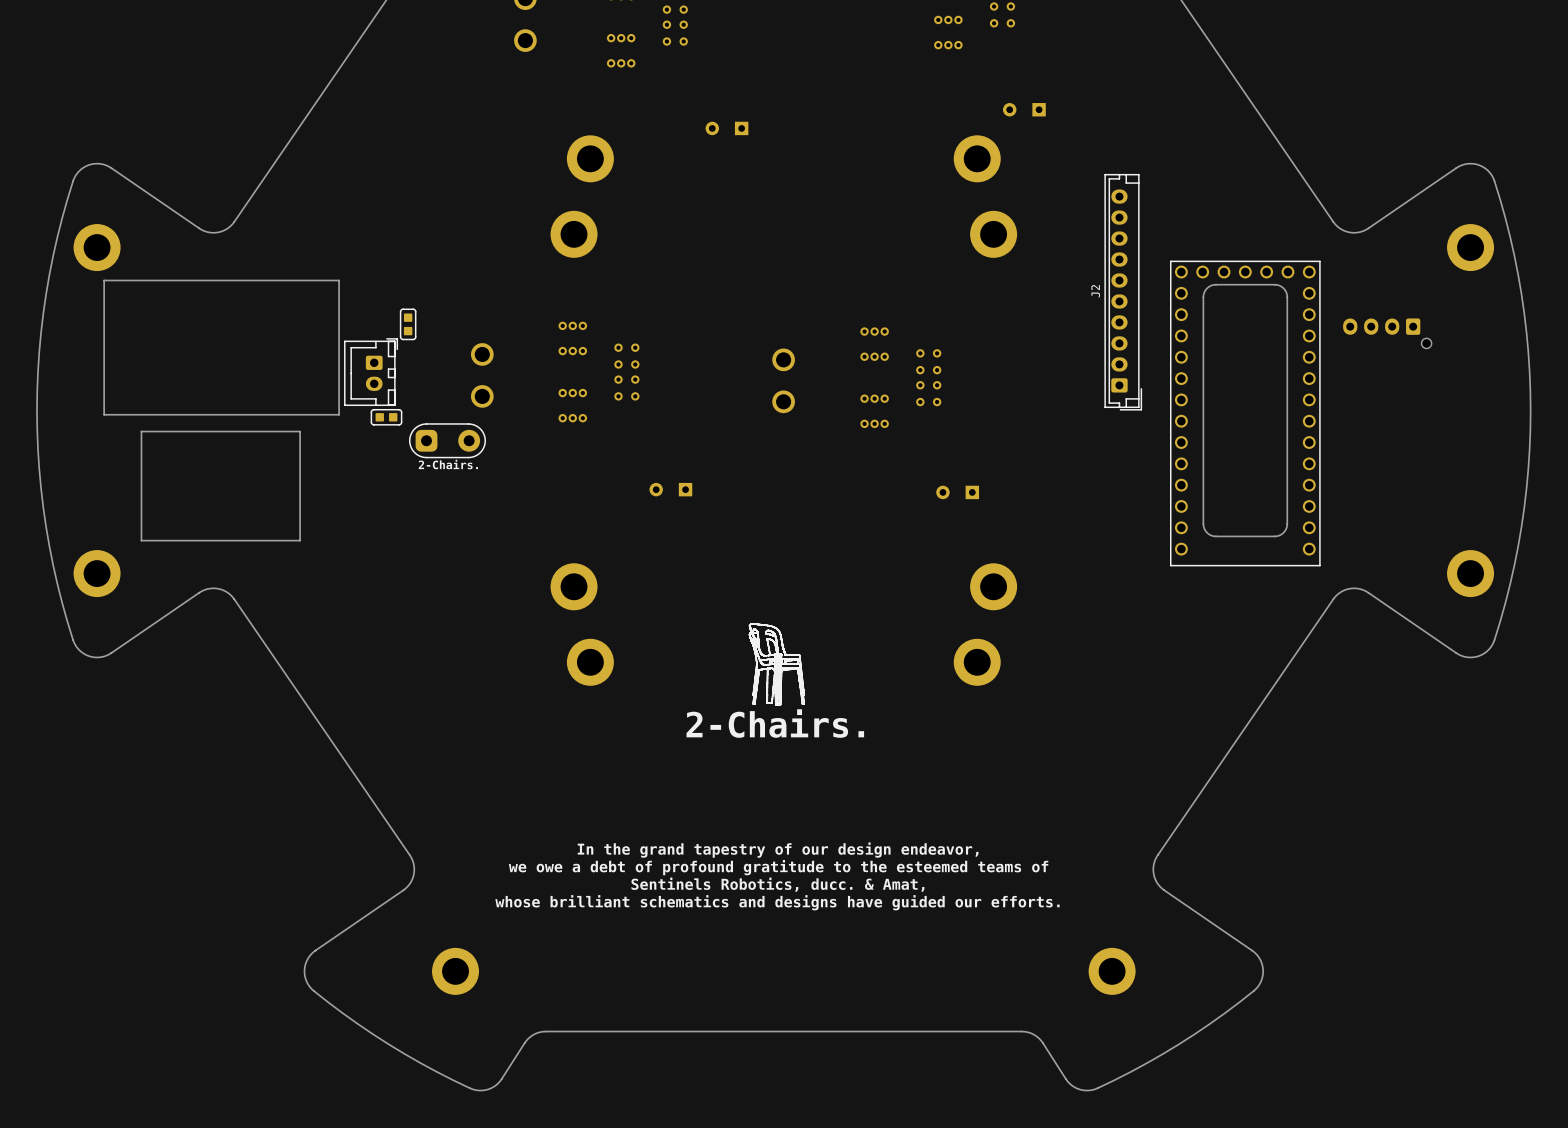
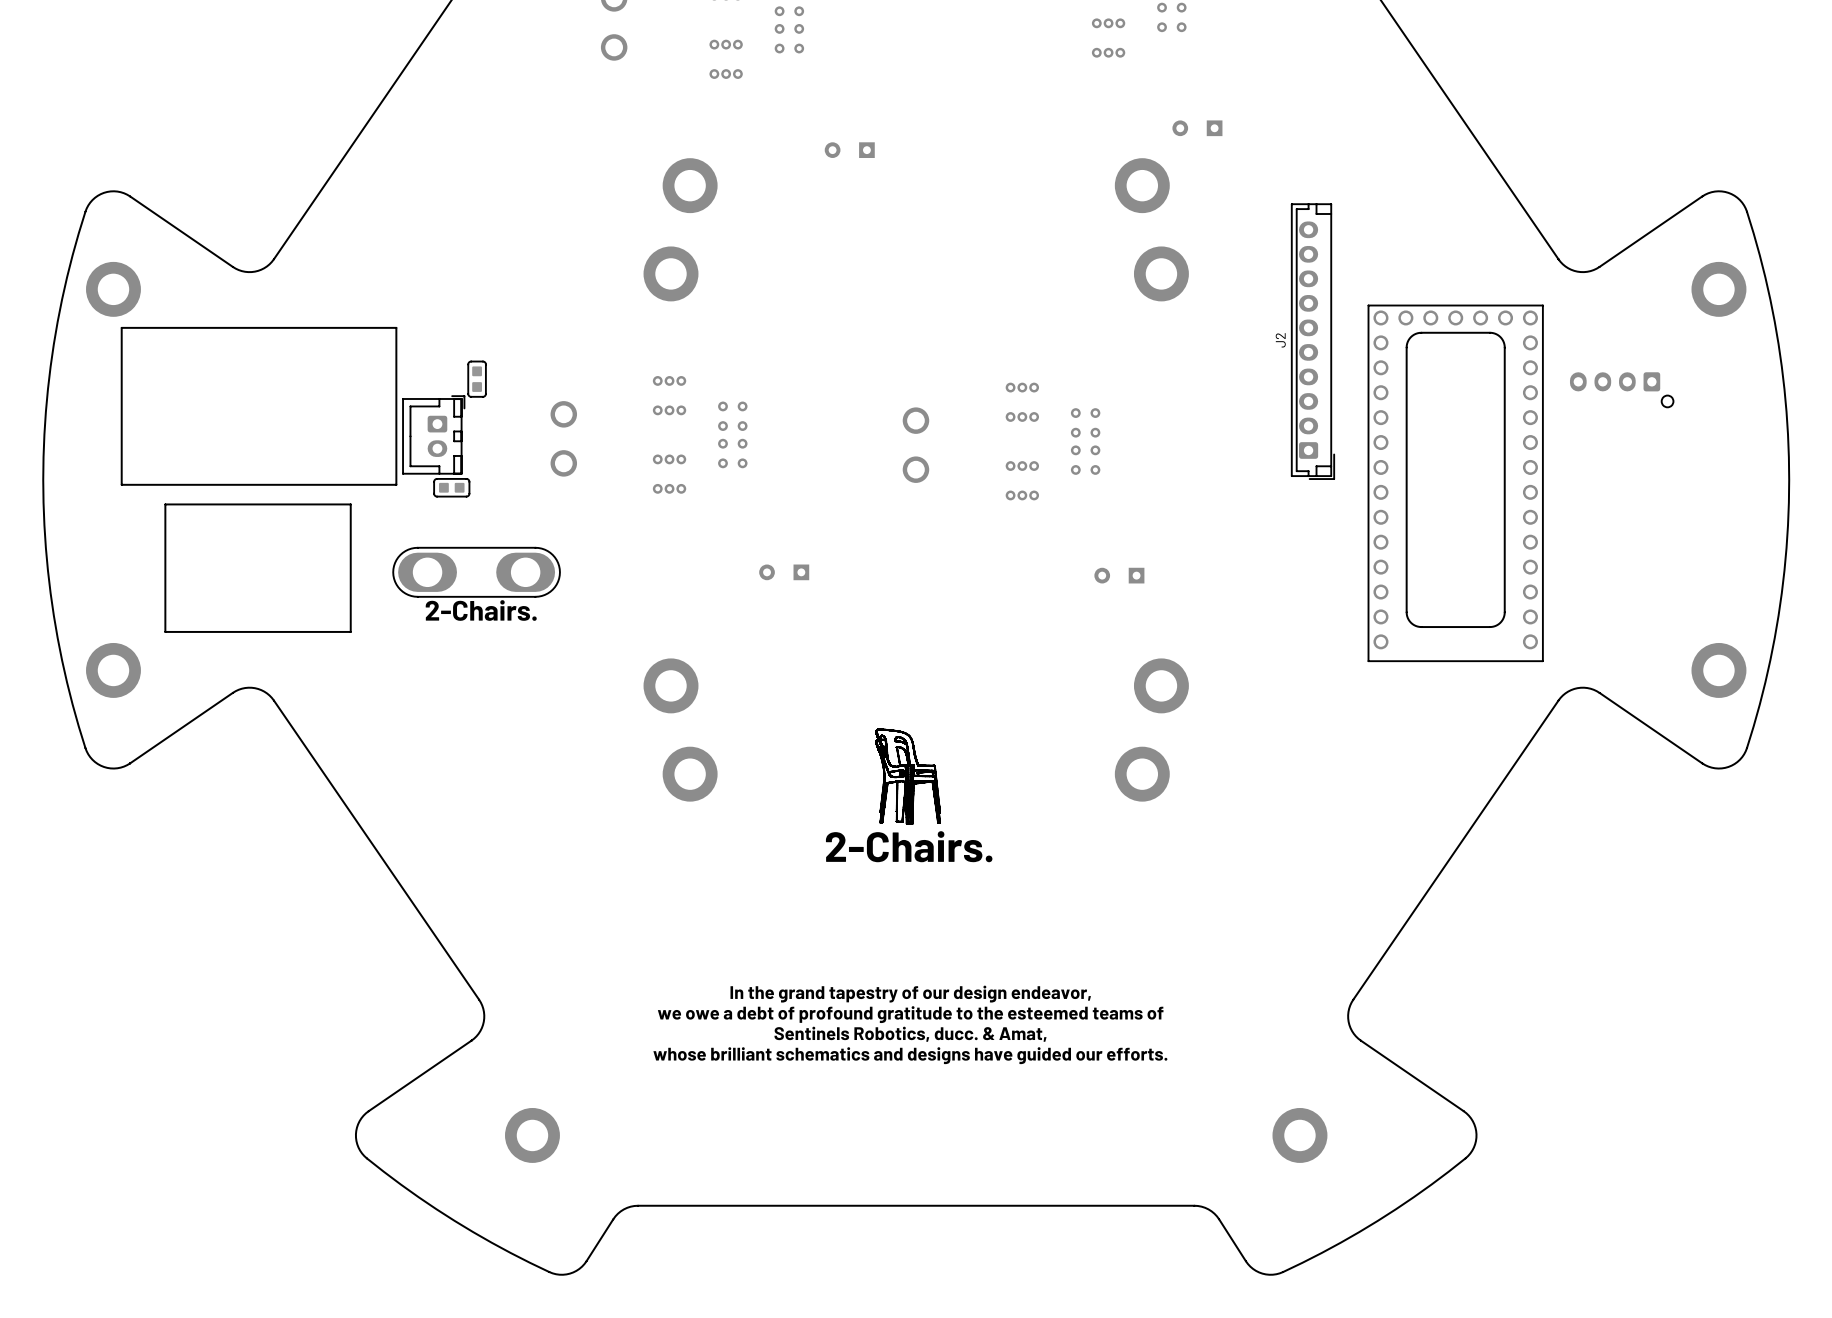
part: (447, 440) -> none
part: none -> (476, 572)

